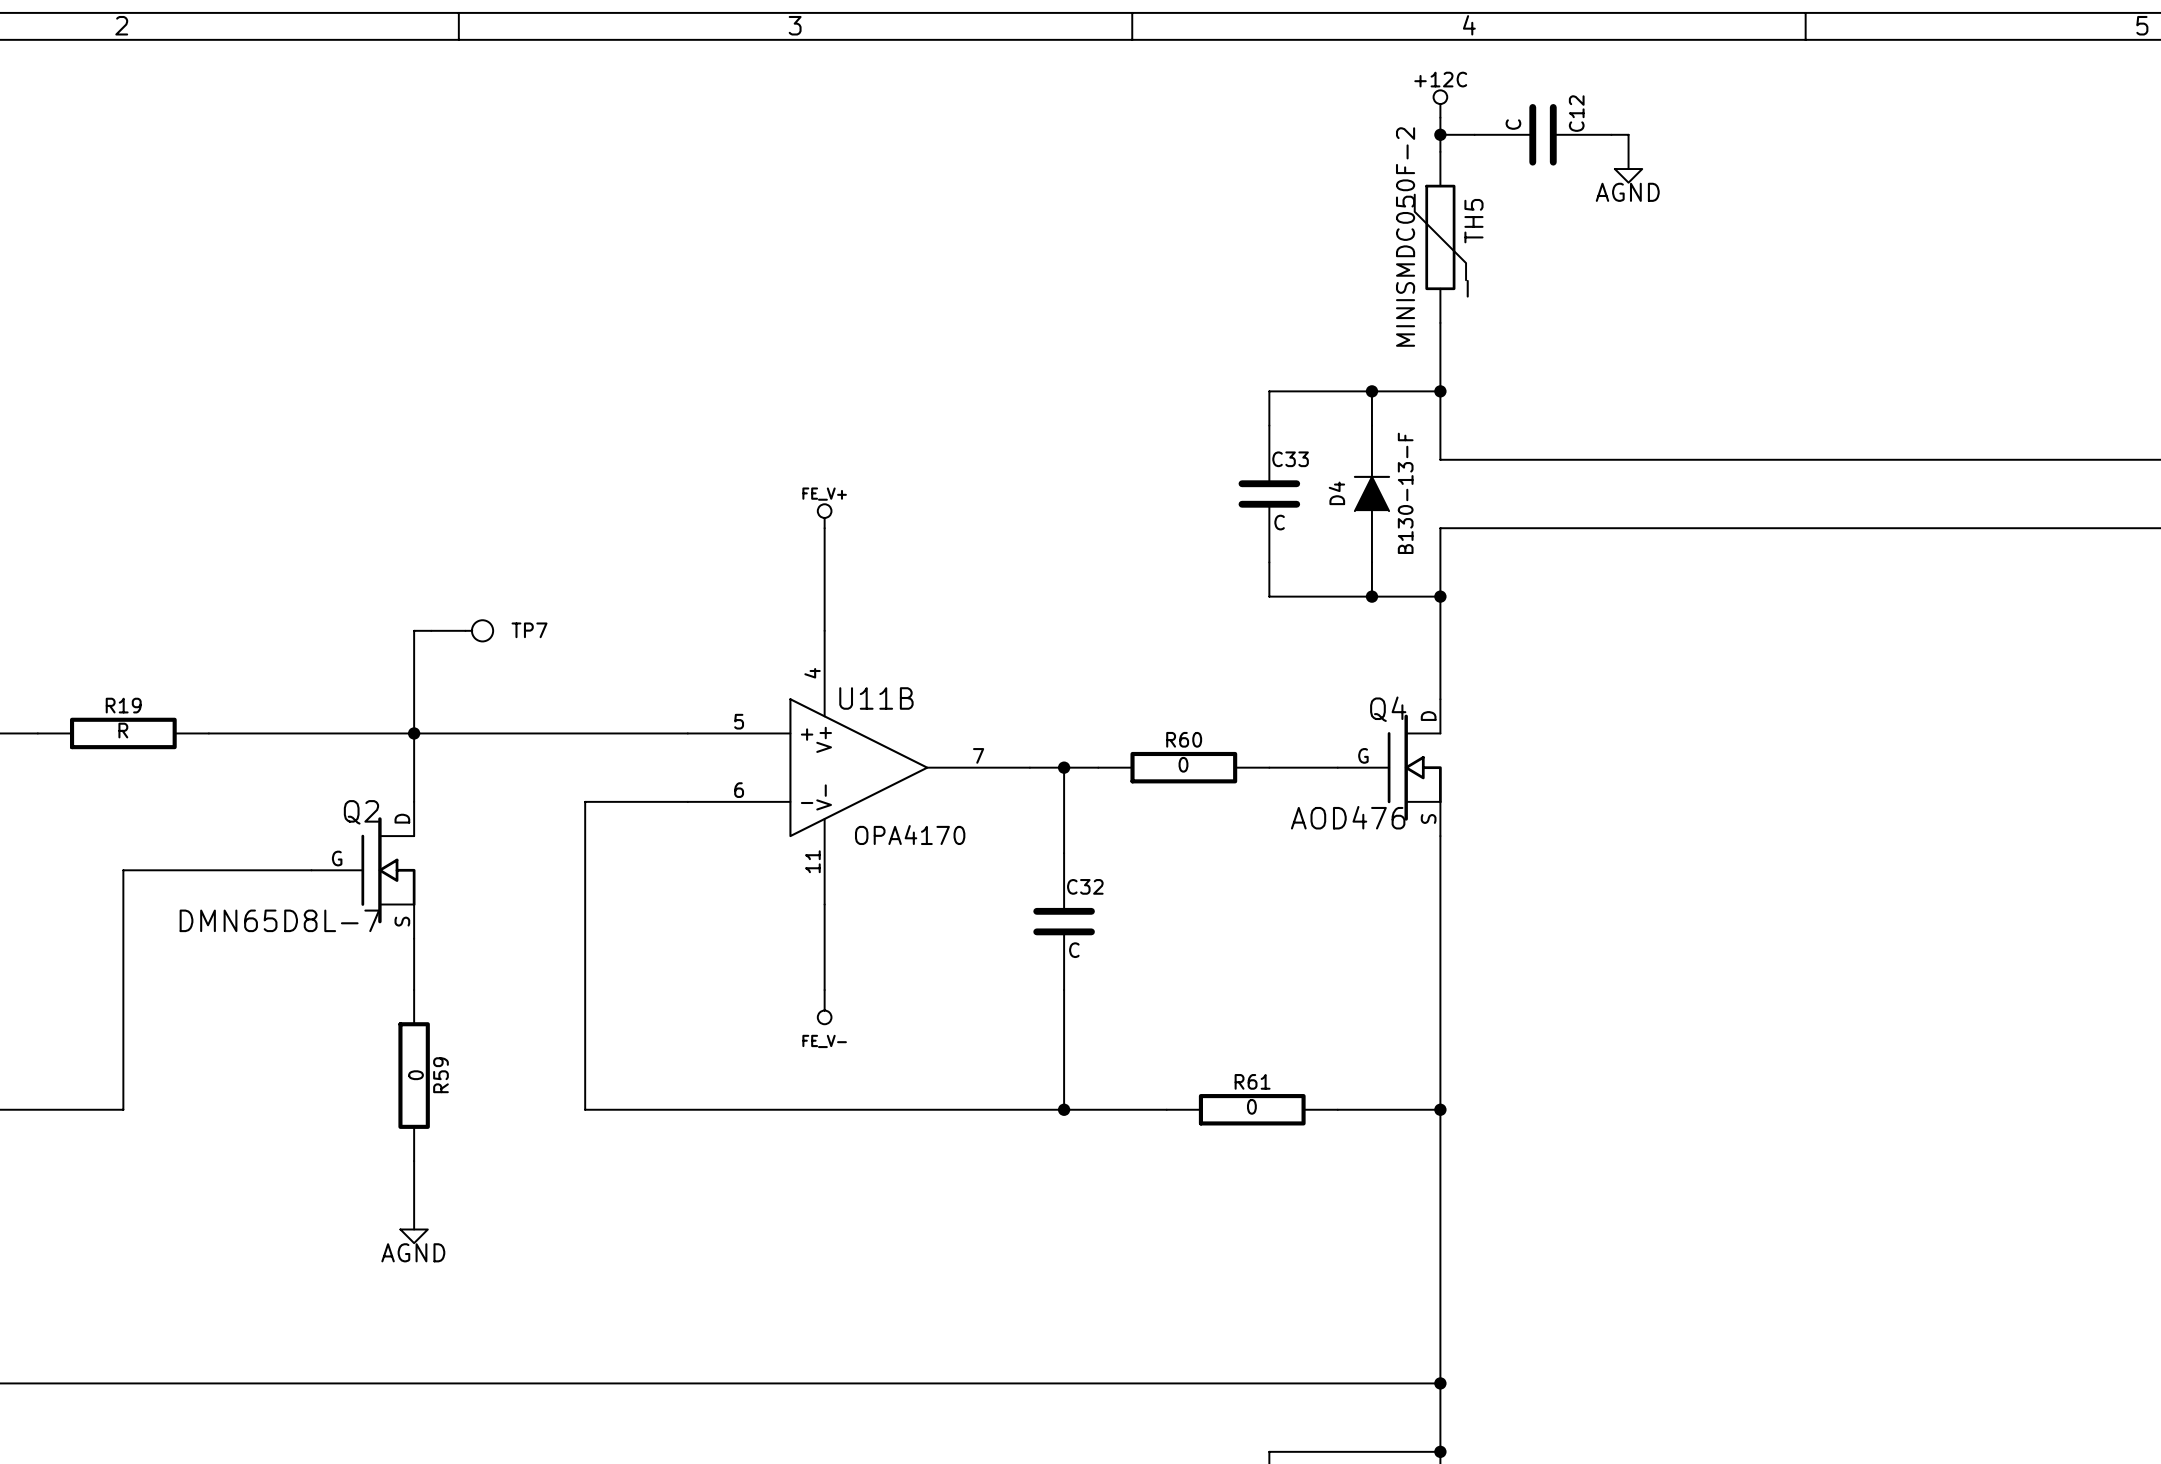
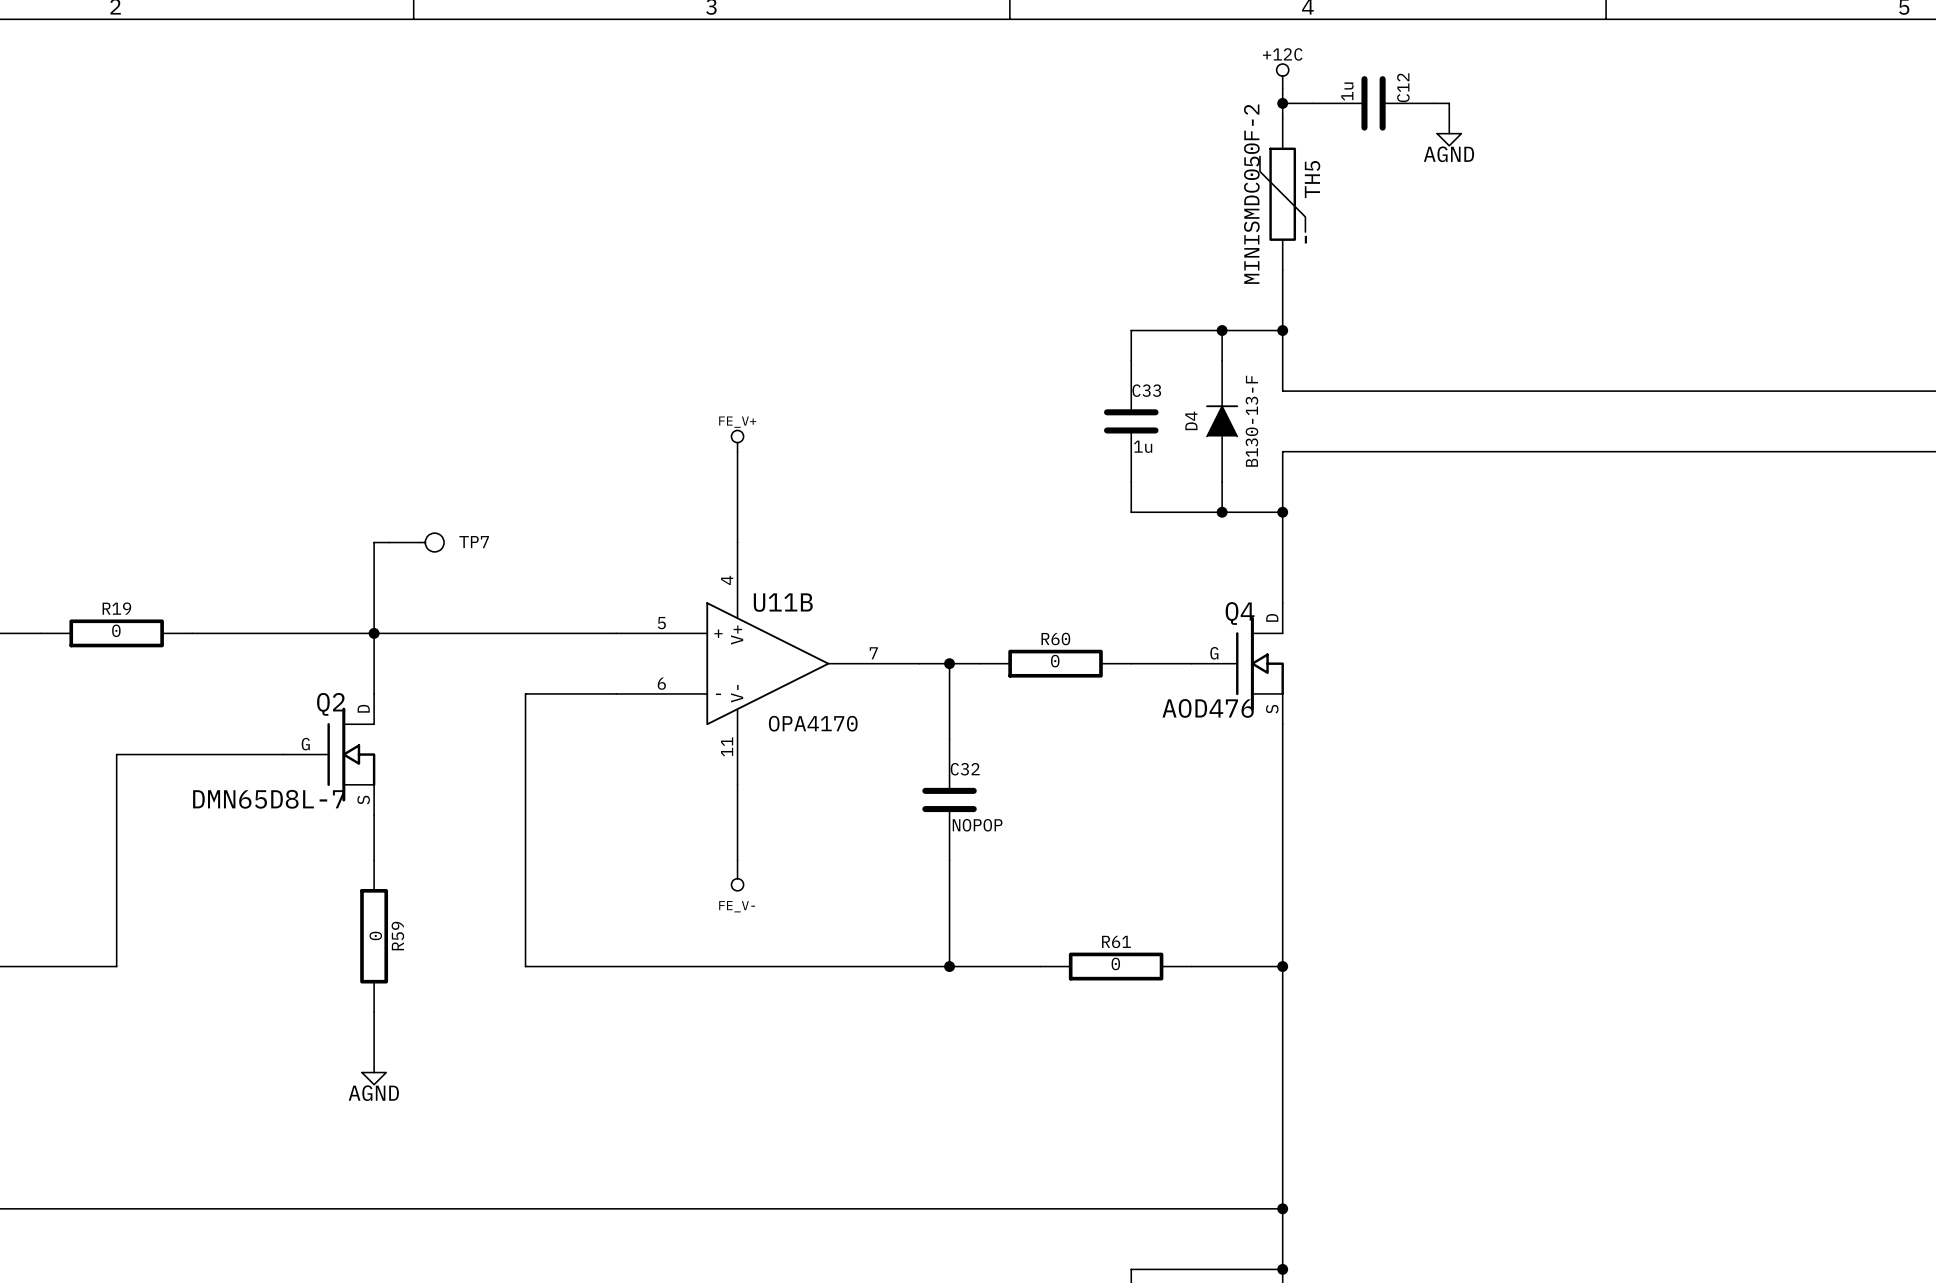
C12 value: C (1513, 124) -> 1u (1347, 91)
C33 value: C (1279, 522) -> 1u (1143, 446)
R19 value: R (123, 730) -> 0 (116, 630)
C32 value: C (1074, 950) -> NOPOP (977, 825)

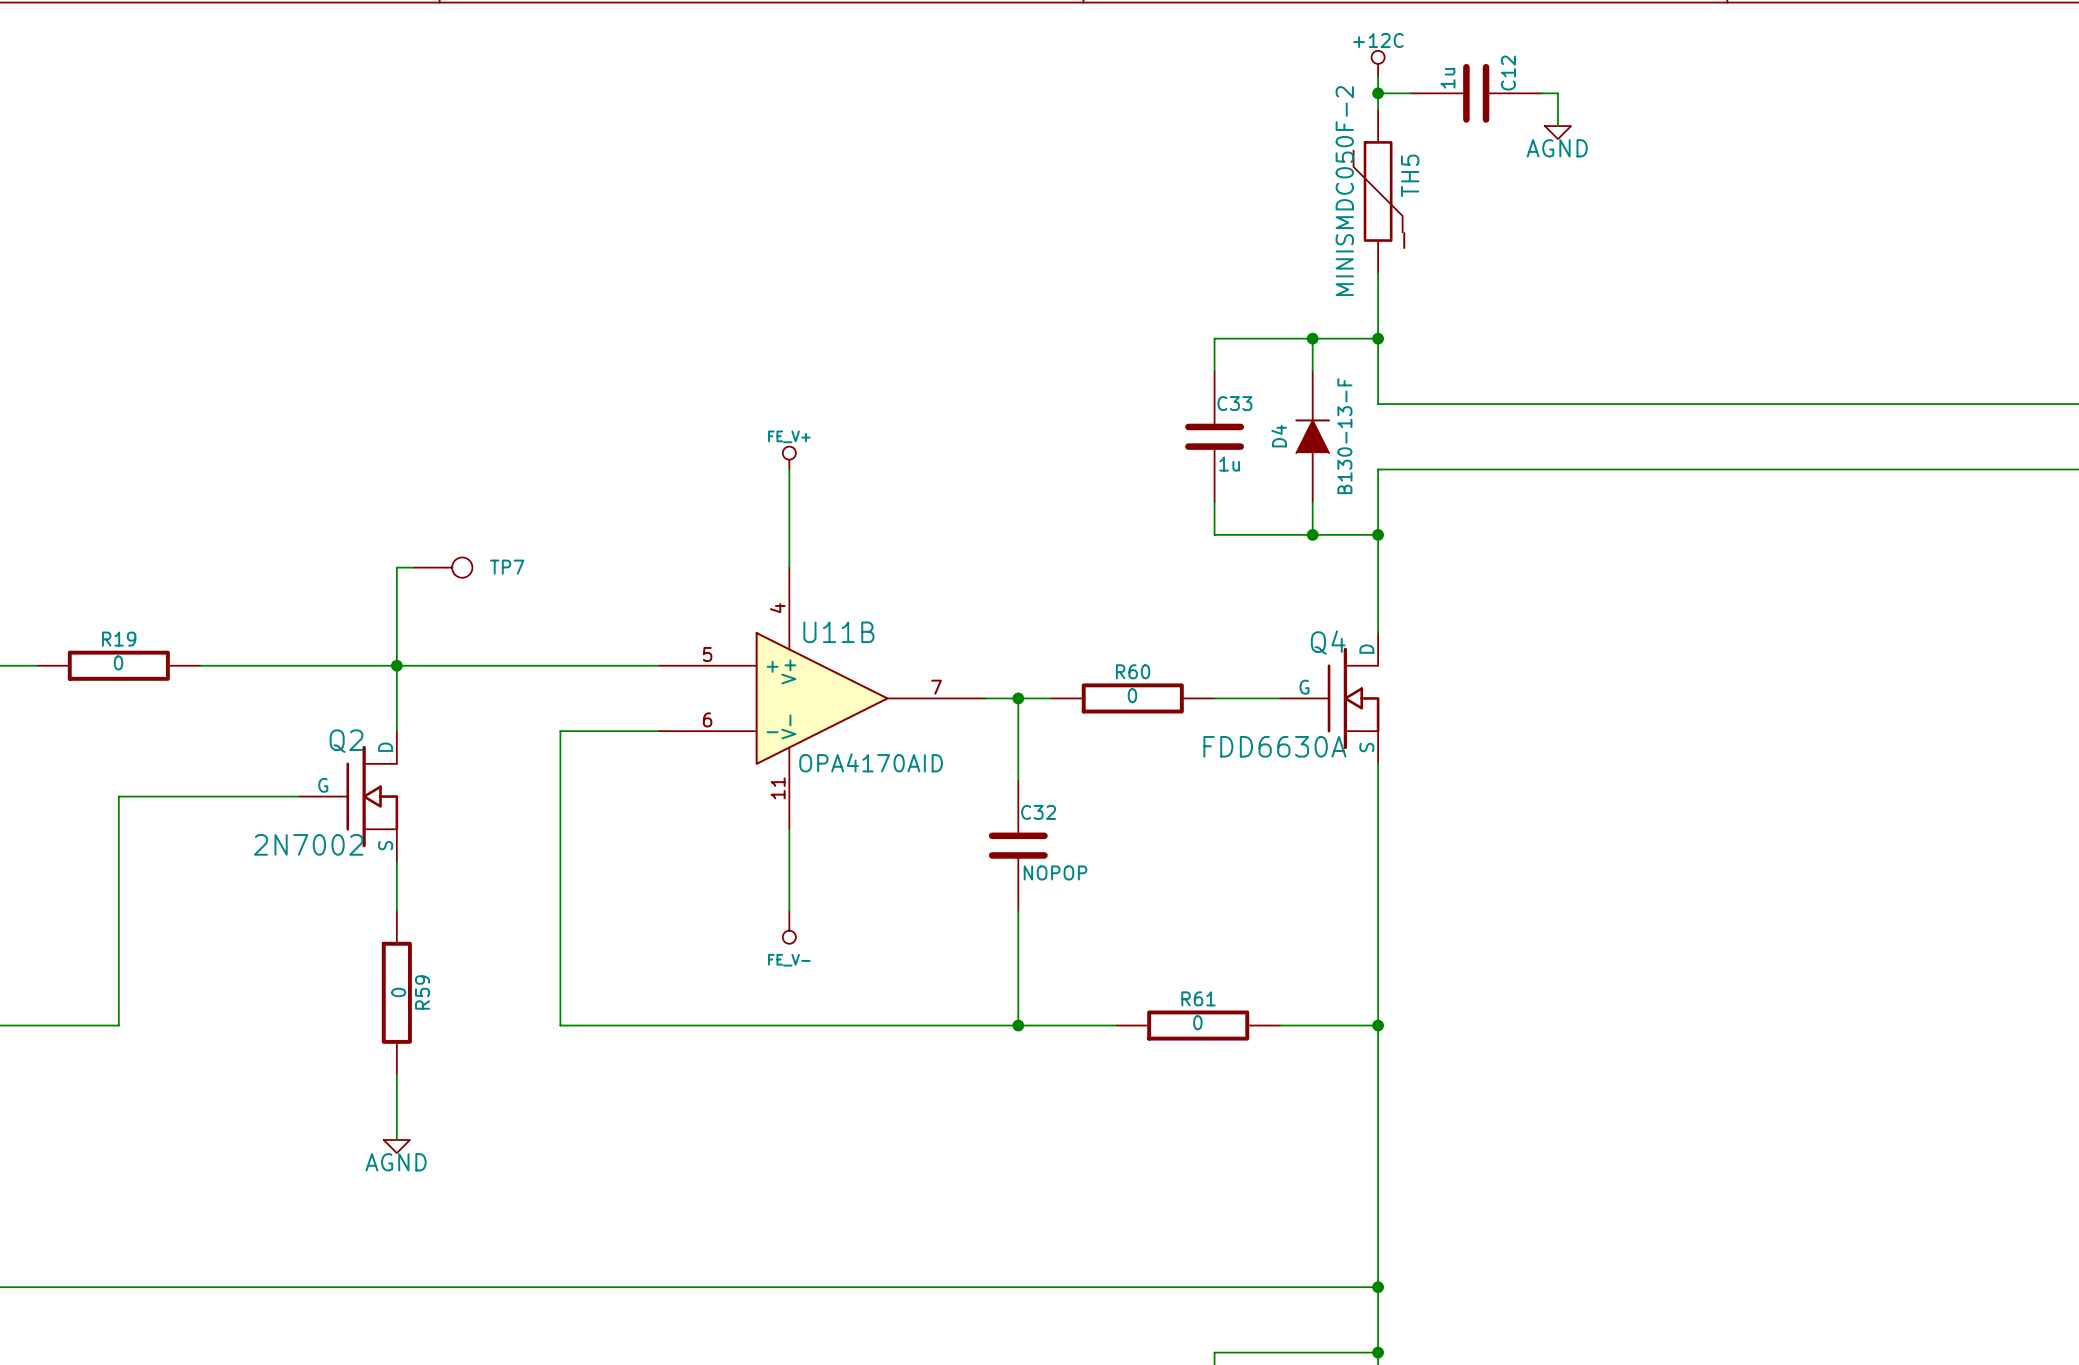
Q4 value: AOD476 (1208, 708) -> FDD6630A (1274, 746)
U11B value: OPA4170 (813, 723) -> OPA4170AID (871, 762)
Q2 value: DMN65D8L-7 (269, 799) -> 2N7002 (308, 844)

